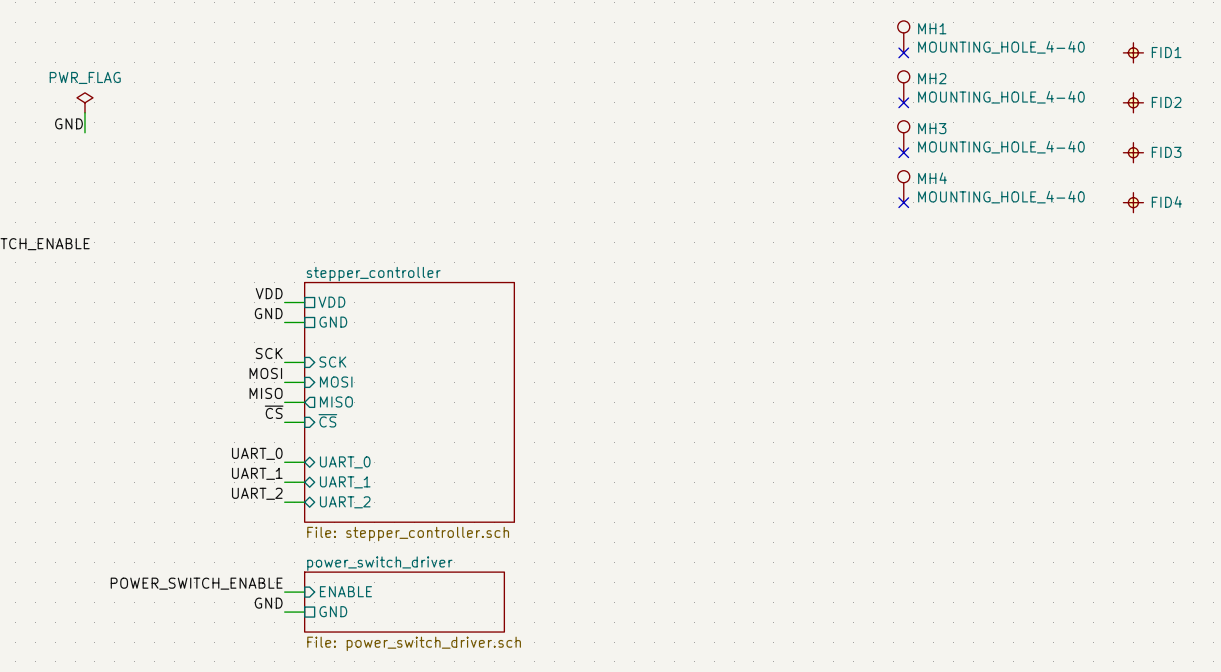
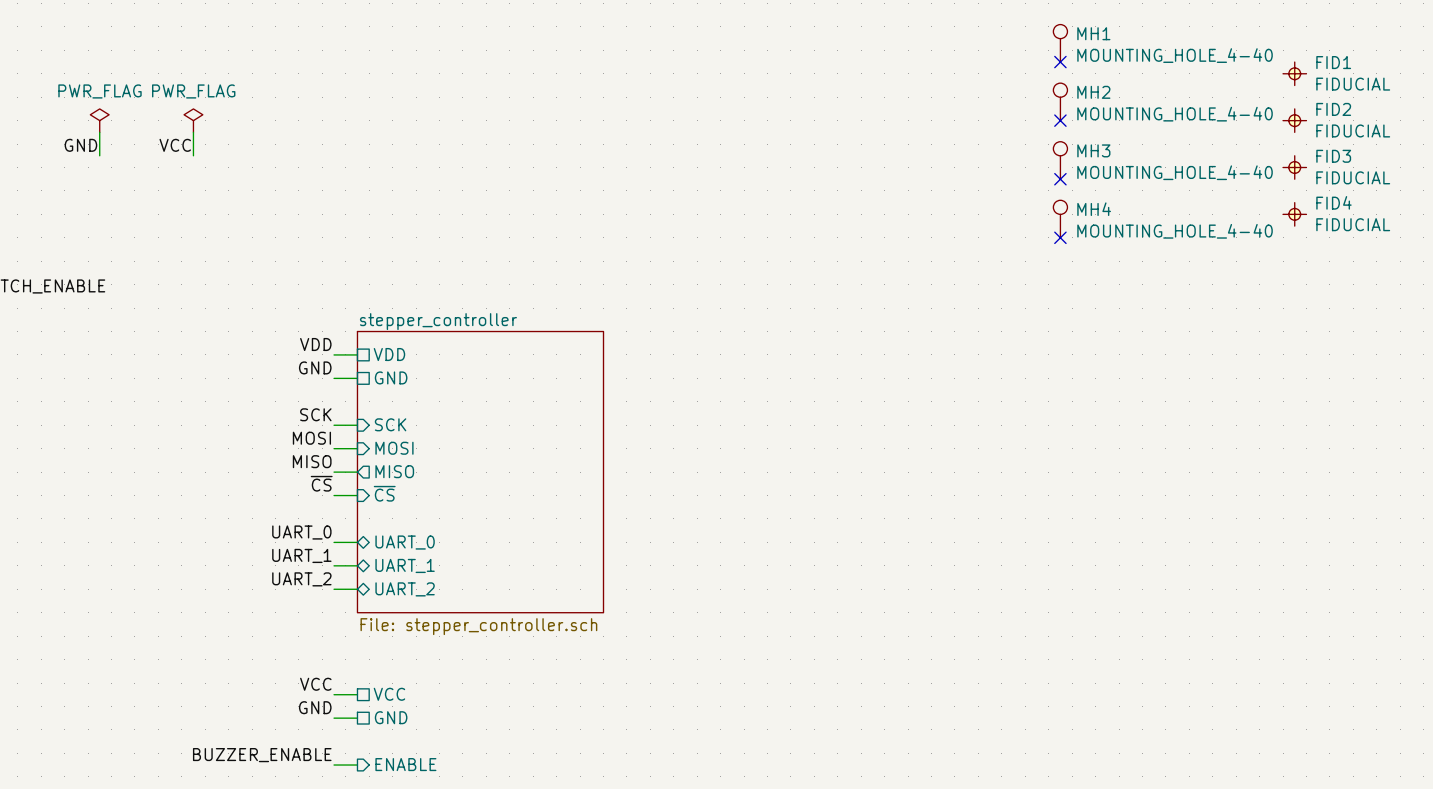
FID1 position: (1133, 52) -> (1294, 73)
FID1 name position: FID1 (1166, 52) -> FID1 (1333, 62)
FID1 value: none -> FIDUCIAL (1353, 84)
power symbol: none -> PWR_FLAG (193, 120)
FID2 position: (1133, 102) -> (1294, 120)
FID2 name position: FID2 (1166, 102) -> FID2 (1333, 109)
FID2 value: none -> FIDUCIAL (1353, 130)
wire: none -> (193, 132) (193, 155)
label: none -> VCC (175, 145)
FID3 value: none -> FIDUCIAL (1353, 177)
FID3 position: (1133, 152) -> (1294, 167)
FID3 name position: FID3 (1166, 152) -> FID3 (1333, 156)
FID4 value: none -> FIDUCIAL (1353, 224)
FID4 position: (1133, 202) -> (1294, 214)
FID4 name position: FID4 (1166, 202) -> FID4 (1333, 202)
label: POWER_SWITCH_ENABLE (196, 583) -> VCC (315, 684)
sheet pin shape: input (345, 591) -> passive (389, 694)
sheet pin: ENABLE (345, 591) -> VCC (389, 694)
sheet power_switch_driver: File: power_switch_driver.sch (404, 602) -> none
label: none -> BUZZER_ENABLE (262, 755)
wire: none -> (334, 765) (357, 765)
sheet pin: none -> ENABLE (405, 764)

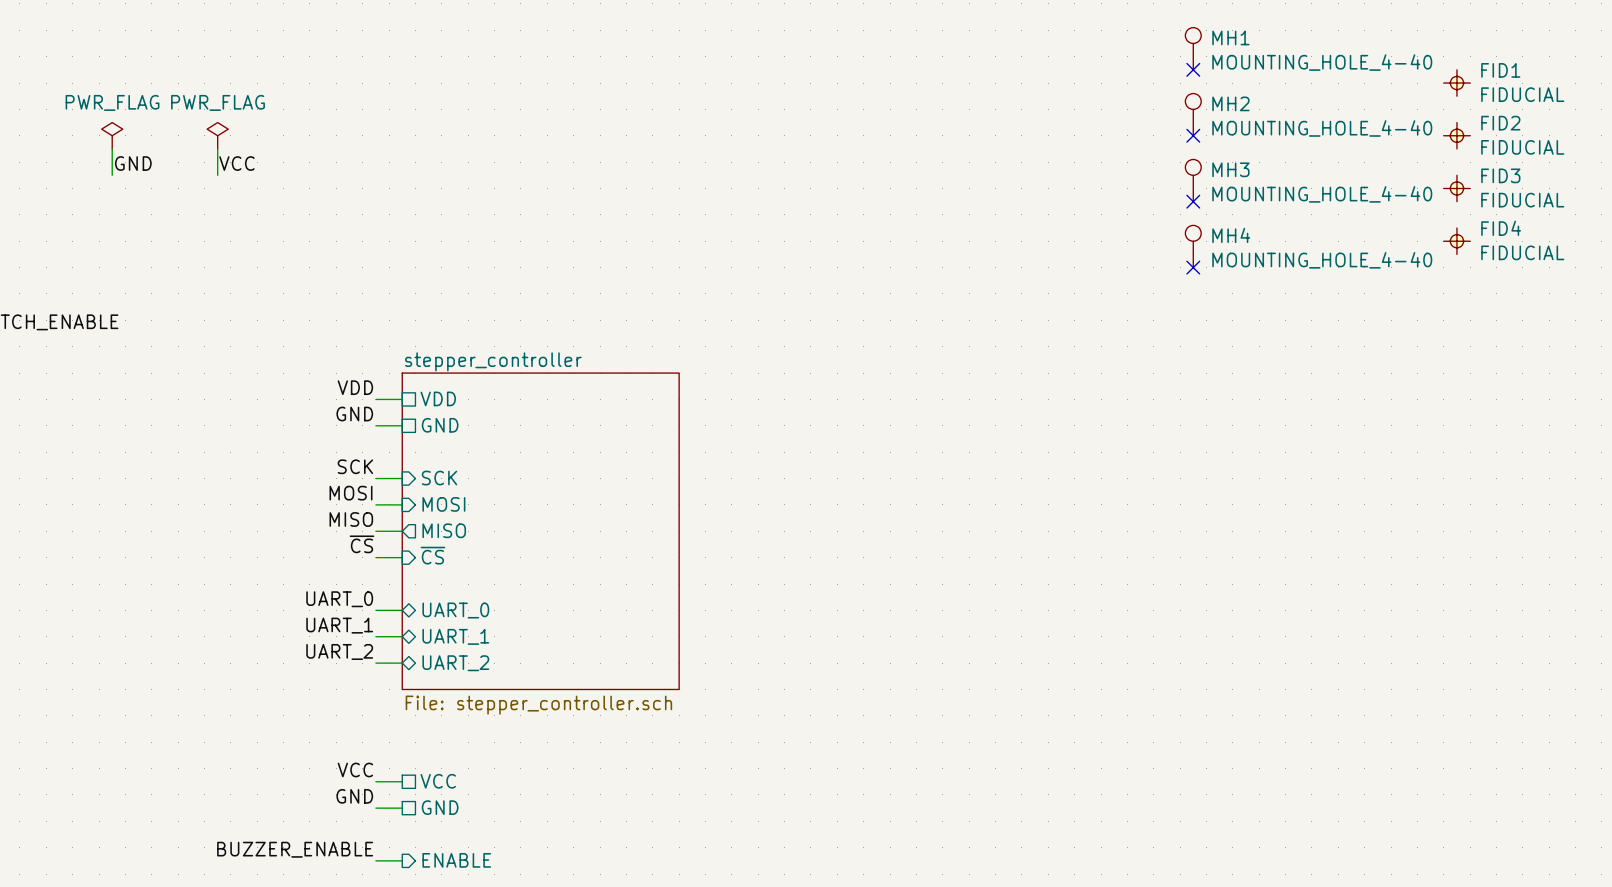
label position: GND (80, 145) -> GND (133, 163)
label position: VCC (175, 145) -> VCC (236, 163)

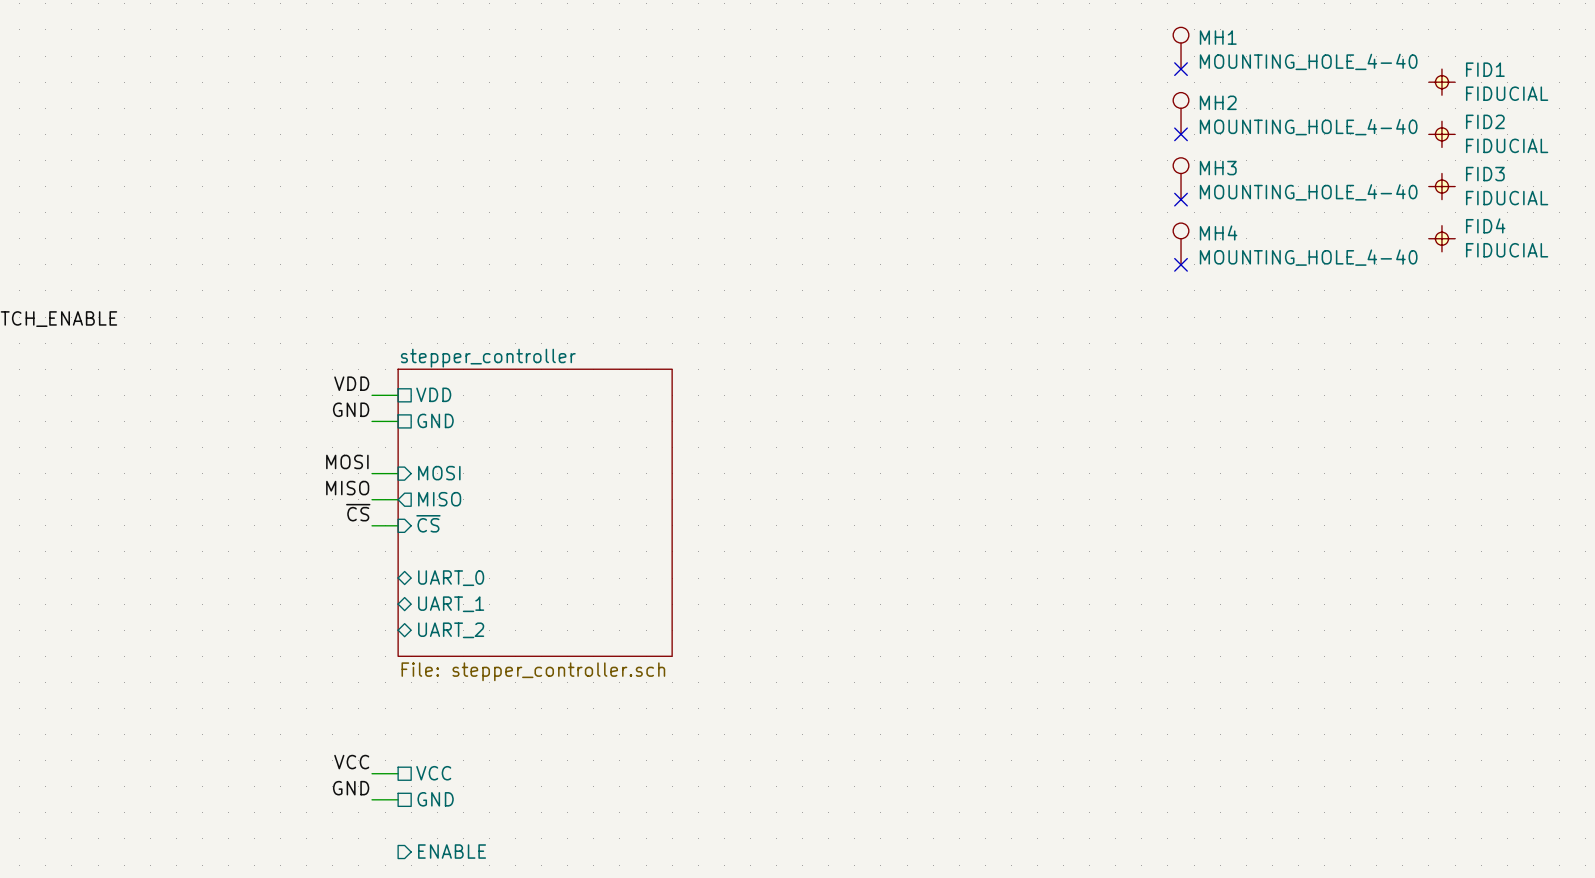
power symbol: PWR_FLAG (112, 135) -> none
power symbol: PWR_FLAG (217, 135) -> none
wire: (112, 148) (112, 175) -> none
wire: (217, 148) (217, 175) -> none
label: GND (133, 163) -> none
label: VCC (236, 163) -> none
label: SCK (355, 466) -> MOSI (347, 461)
sheet pin: SCK (439, 478) -> MOSI (439, 473)
label: MOSI (350, 493) -> MISO (347, 488)
sheet pin shape: input (443, 504) -> output (439, 499)
sheet pin: MOSI (443, 504) -> MISO (439, 499)
sheet stepper_controller: none -> File: stepper_controller.sch (535, 512)
label: MISO (351, 519) -> ~{CS} (358, 512)
sheet pin shape: output (444, 530) -> input (428, 523)
sheet pin: MISO (444, 530) -> ~{CS} (428, 523)
sheet stepper_controller: File: stepper_controller.sch (540, 531) -> none
label: ~{CS} (361, 544) -> none
sheet pin: ~{CS} (432, 555) -> none
wire: (375, 557) (402, 557) -> none
sheet pin: none -> UART_0 (451, 578)
label: UART_0 (339, 599) -> none
wire: (375, 610) (402, 610) -> none
sheet pin: UART_0 (455, 610) -> UART_1 (451, 604)
label: UART_1 (339, 625) -> none
wire: (375, 636) (402, 636) -> none
sheet pin: UART_1 (455, 636) -> UART_2 (451, 630)
label: UART_2 (339, 651) -> none
wire: (375, 663) (402, 663) -> none
sheet pin: UART_2 (455, 663) -> none
label: BUZZER_ENABLE (295, 849) -> none
wire: (375, 860) (402, 860) -> none

